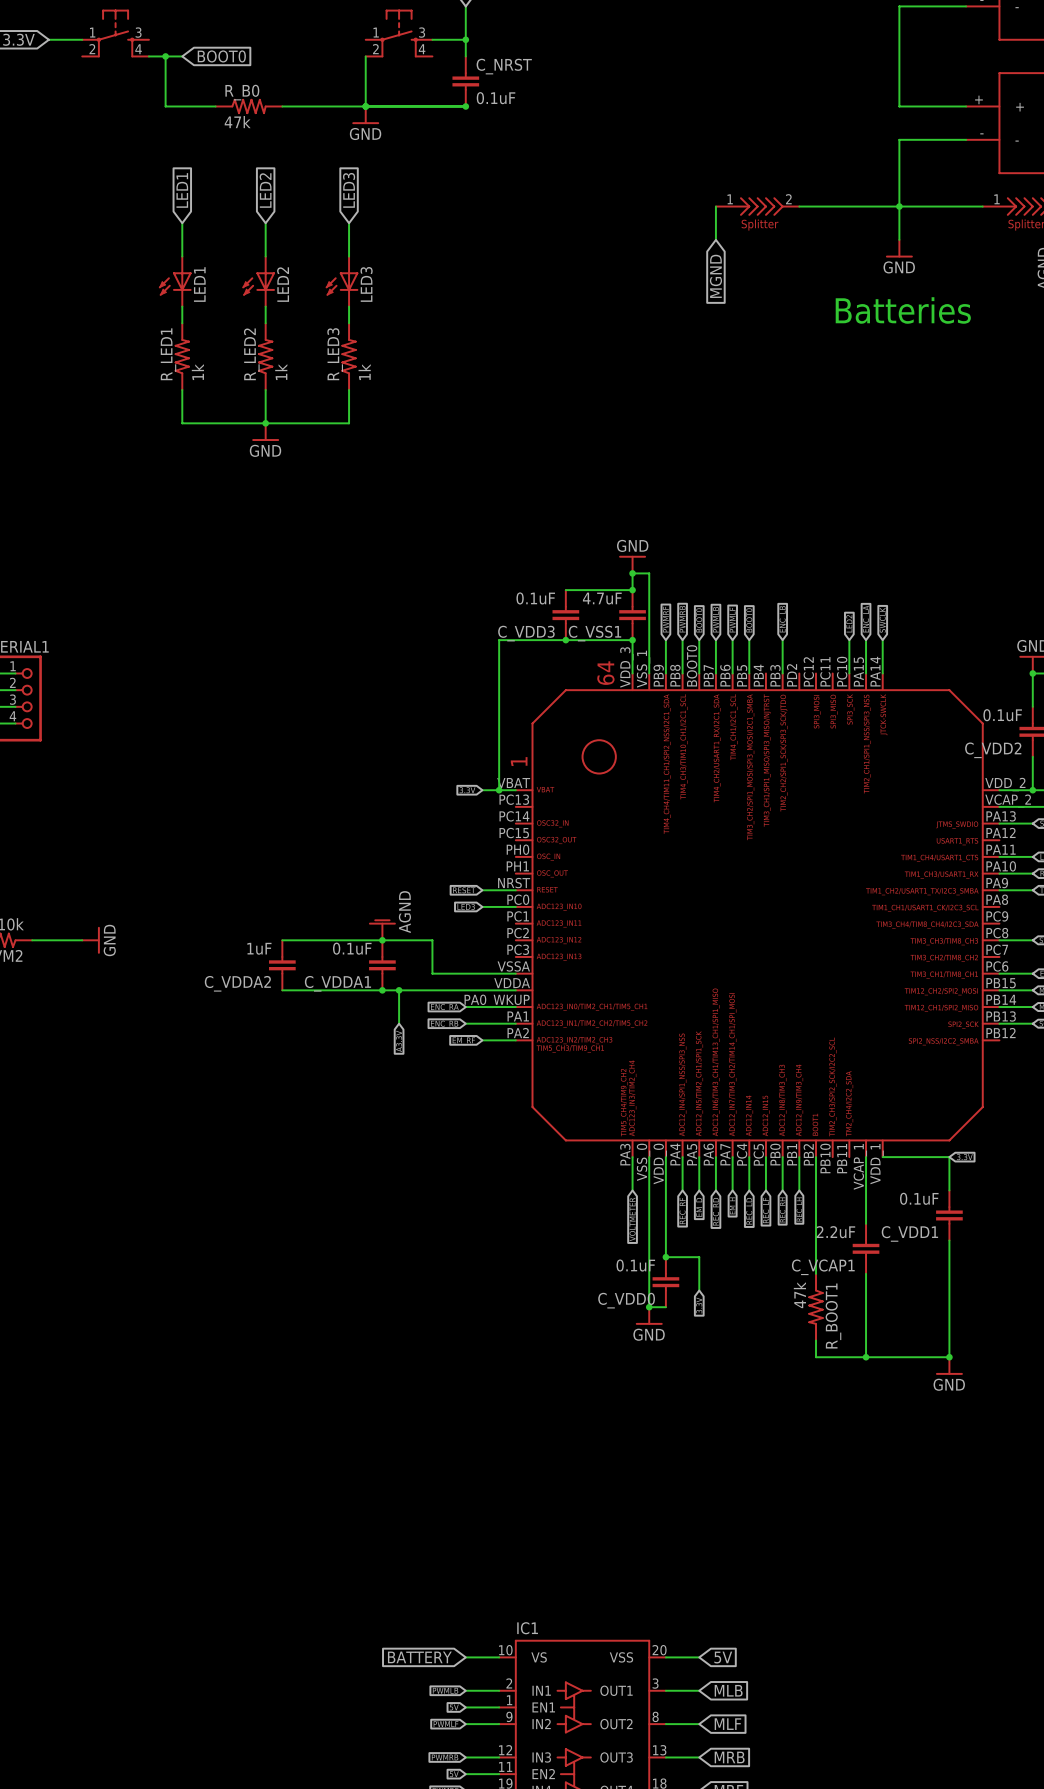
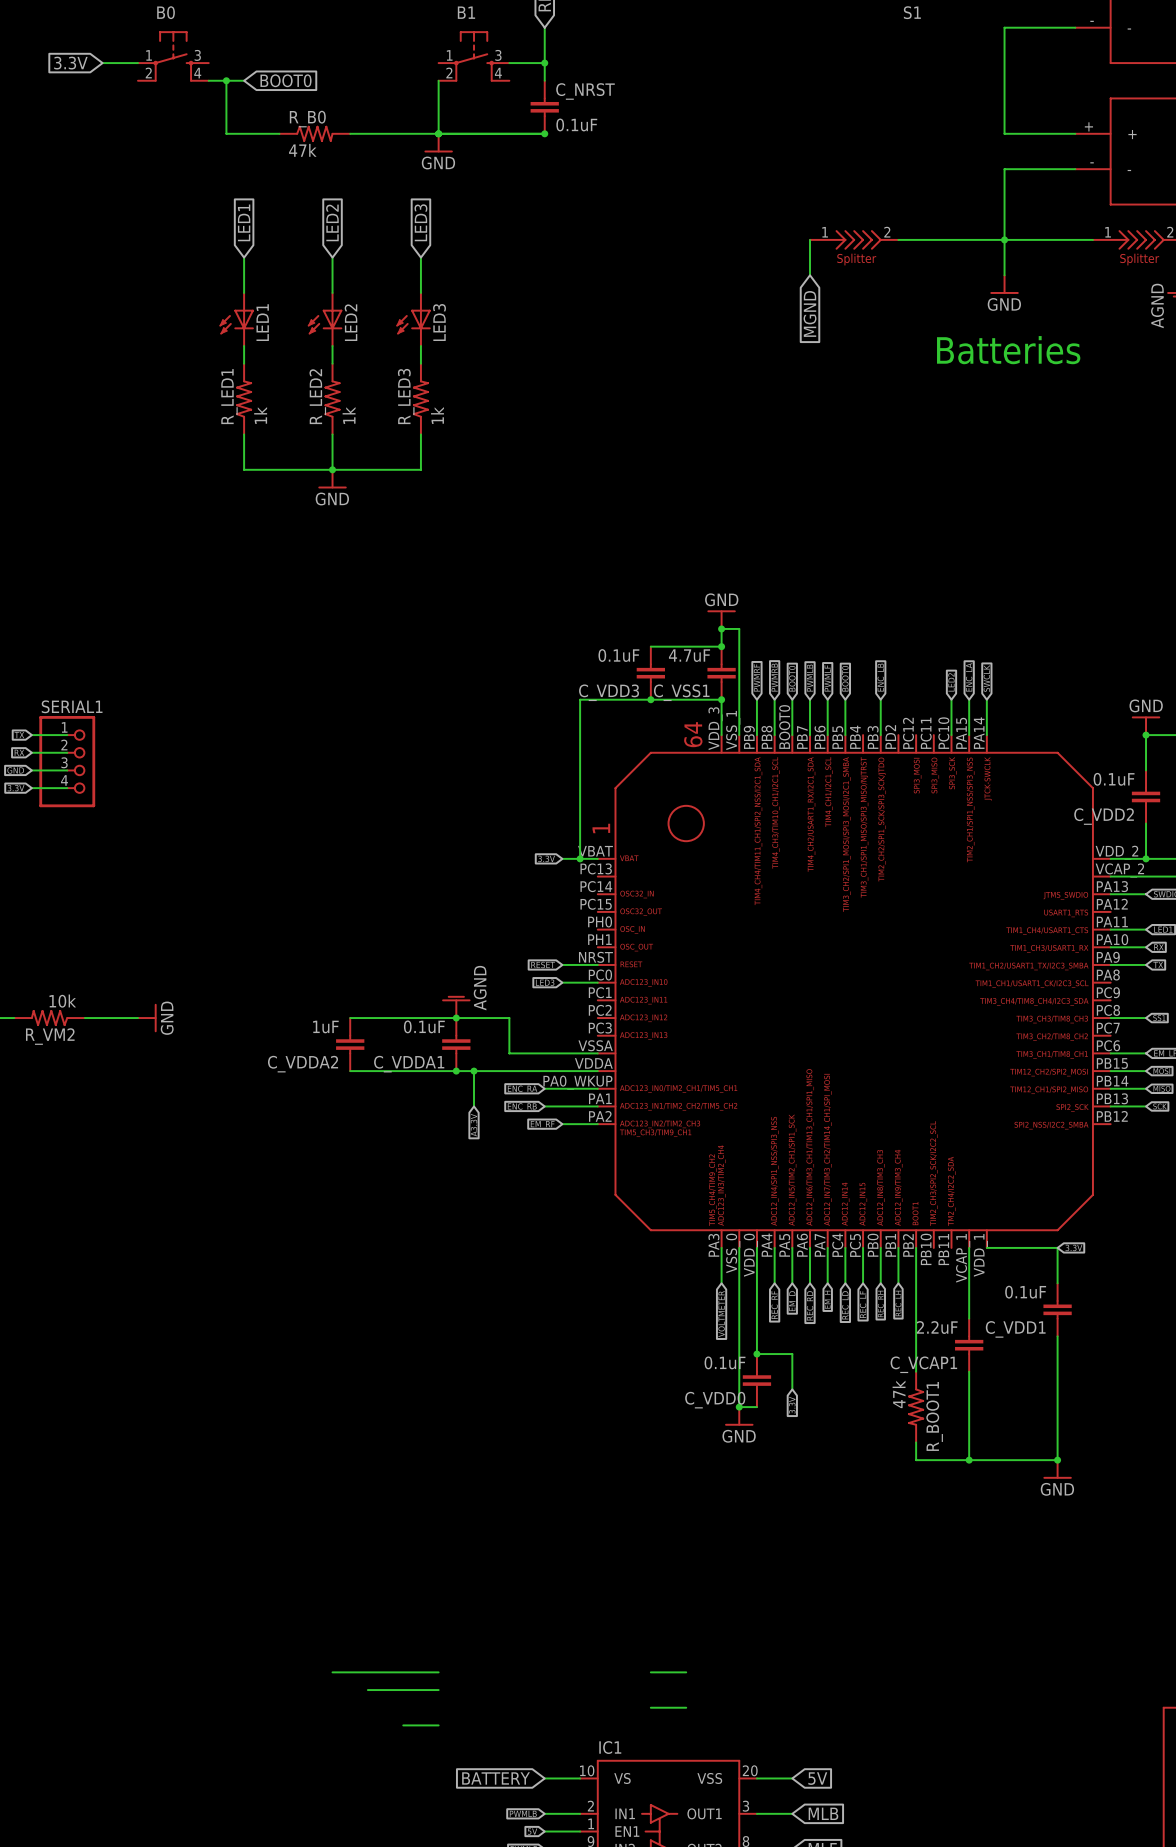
wire: none -> (332, 1672) (438, 1672)
wire: none -> (650, 1672) (686, 1672)
wire: none -> (367, 1690) (438, 1690)
wire: none -> (650, 1707) (686, 1707)
wire: none -> (403, 1725) (438, 1725)

